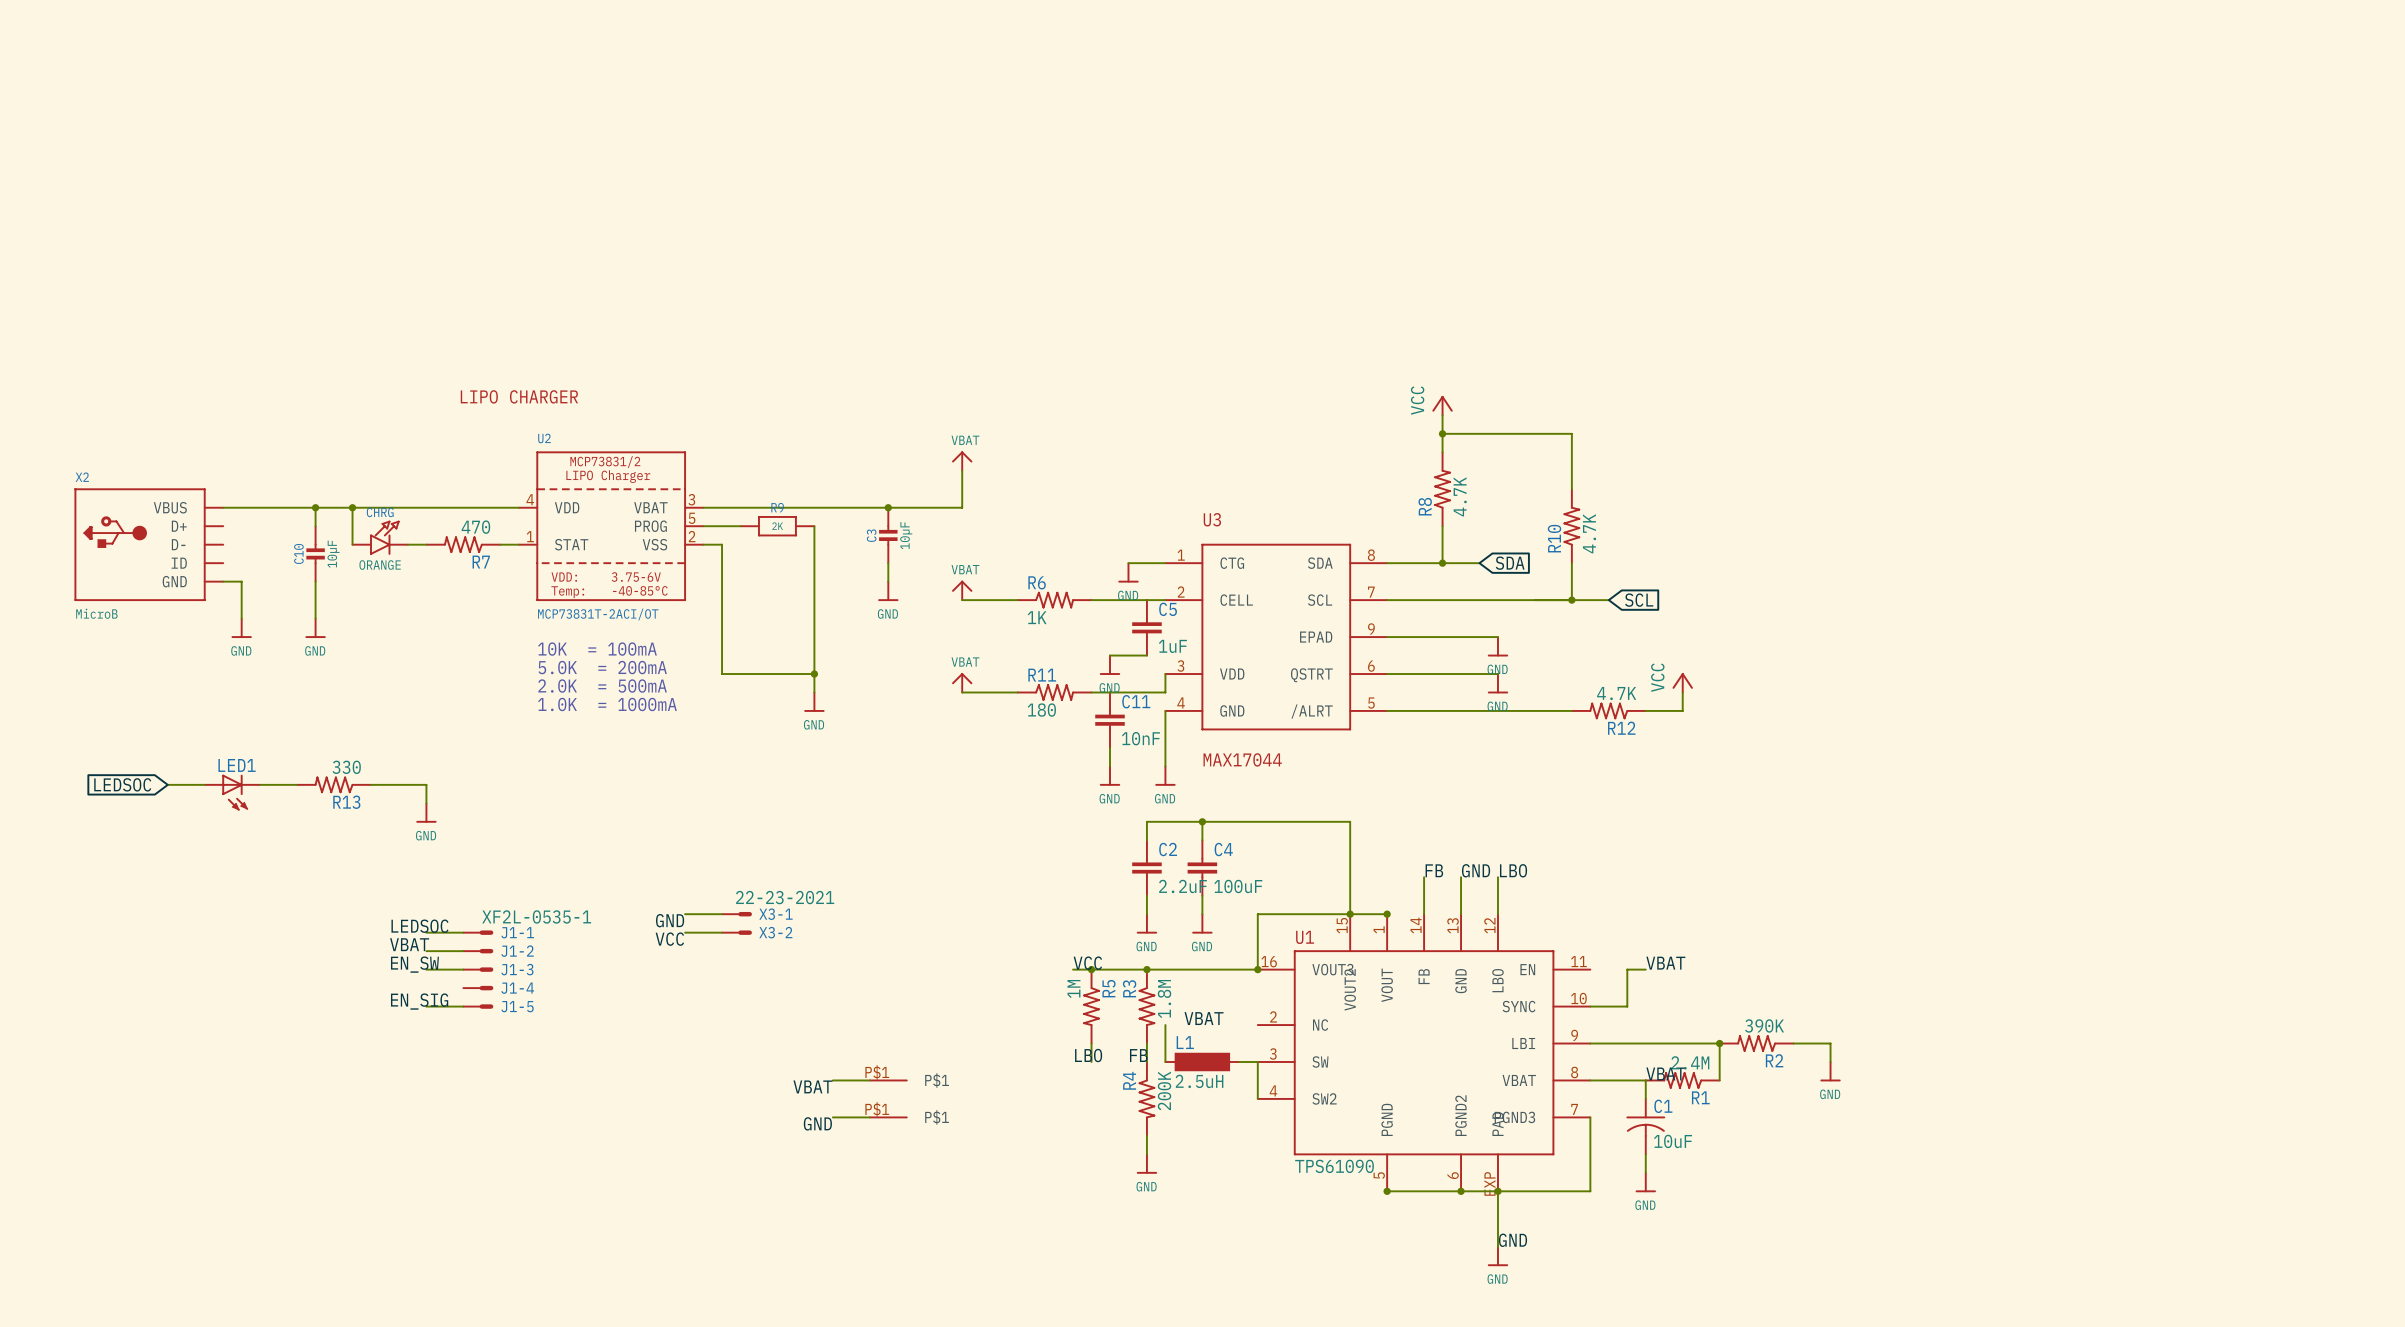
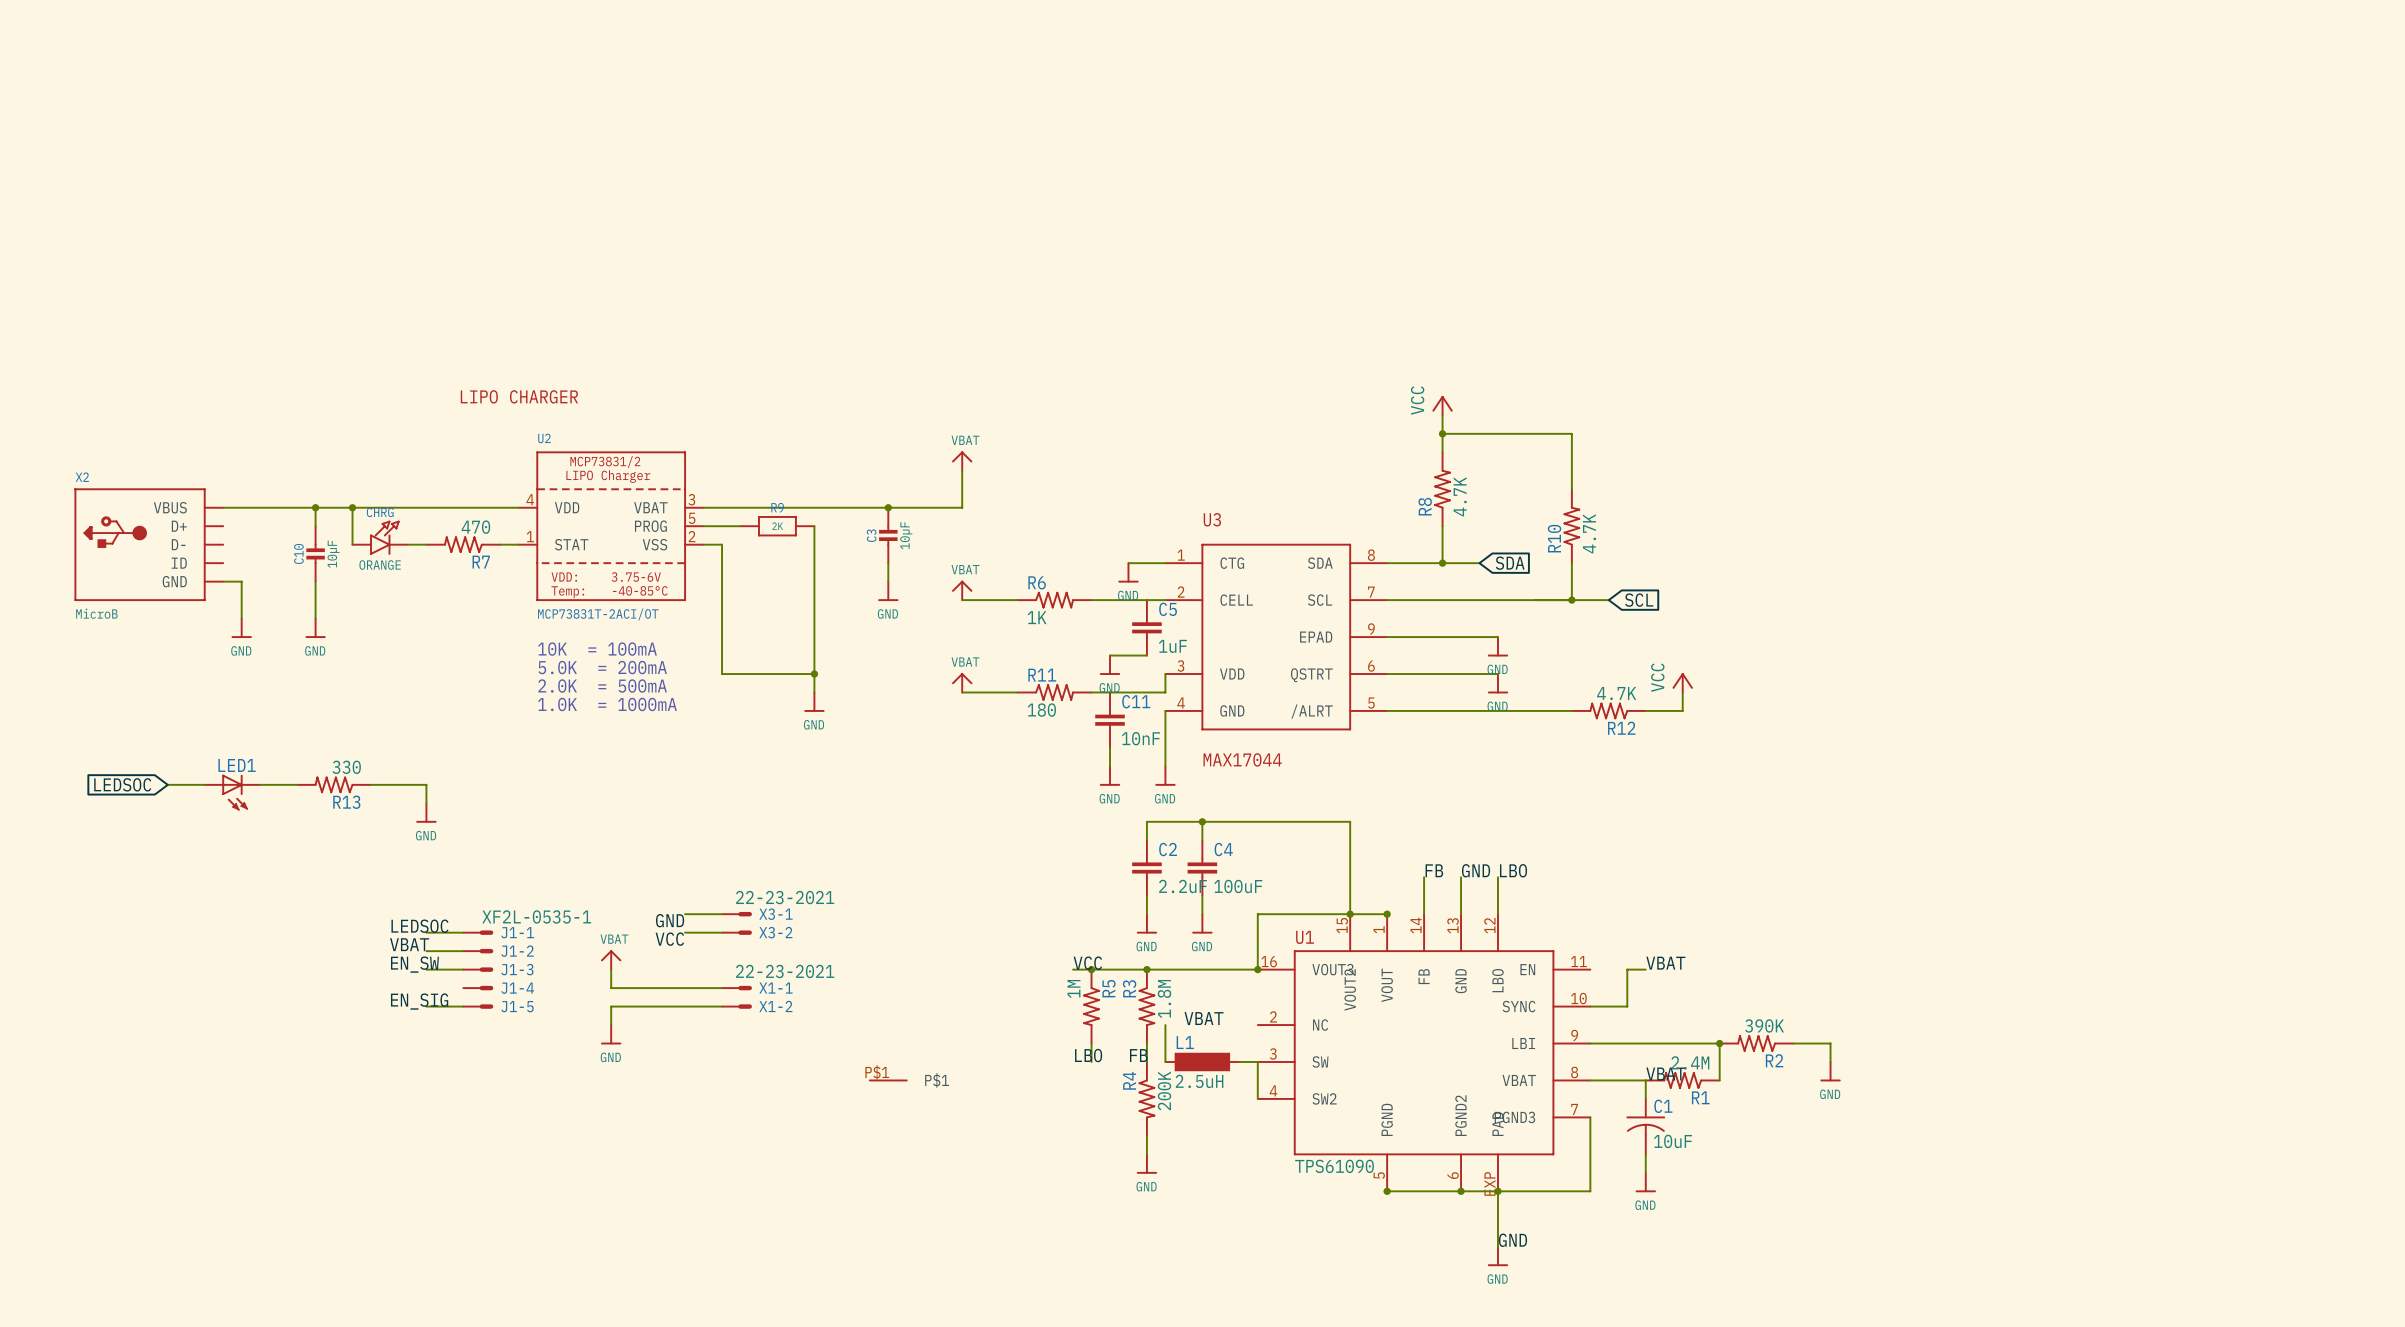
power symbol: none -> VBAT (611, 959)
wire: none -> (611, 969) (611, 988) (722, 988)
X1-1: none -> 22-23-2021 (736, 988)
wire: none -> (722, 1006) (611, 1006) (611, 1025)
X1-2: none -> (736, 1006)
power symbol: none -> GND (611, 1034)
wire: (832, 1080) (869, 1080) -> none
label: VBAT (812, 1086) -> none
wire: (832, 1117) (869, 1117) -> none
part: (888, 1117) -> none
label: GND (817, 1123) -> none

